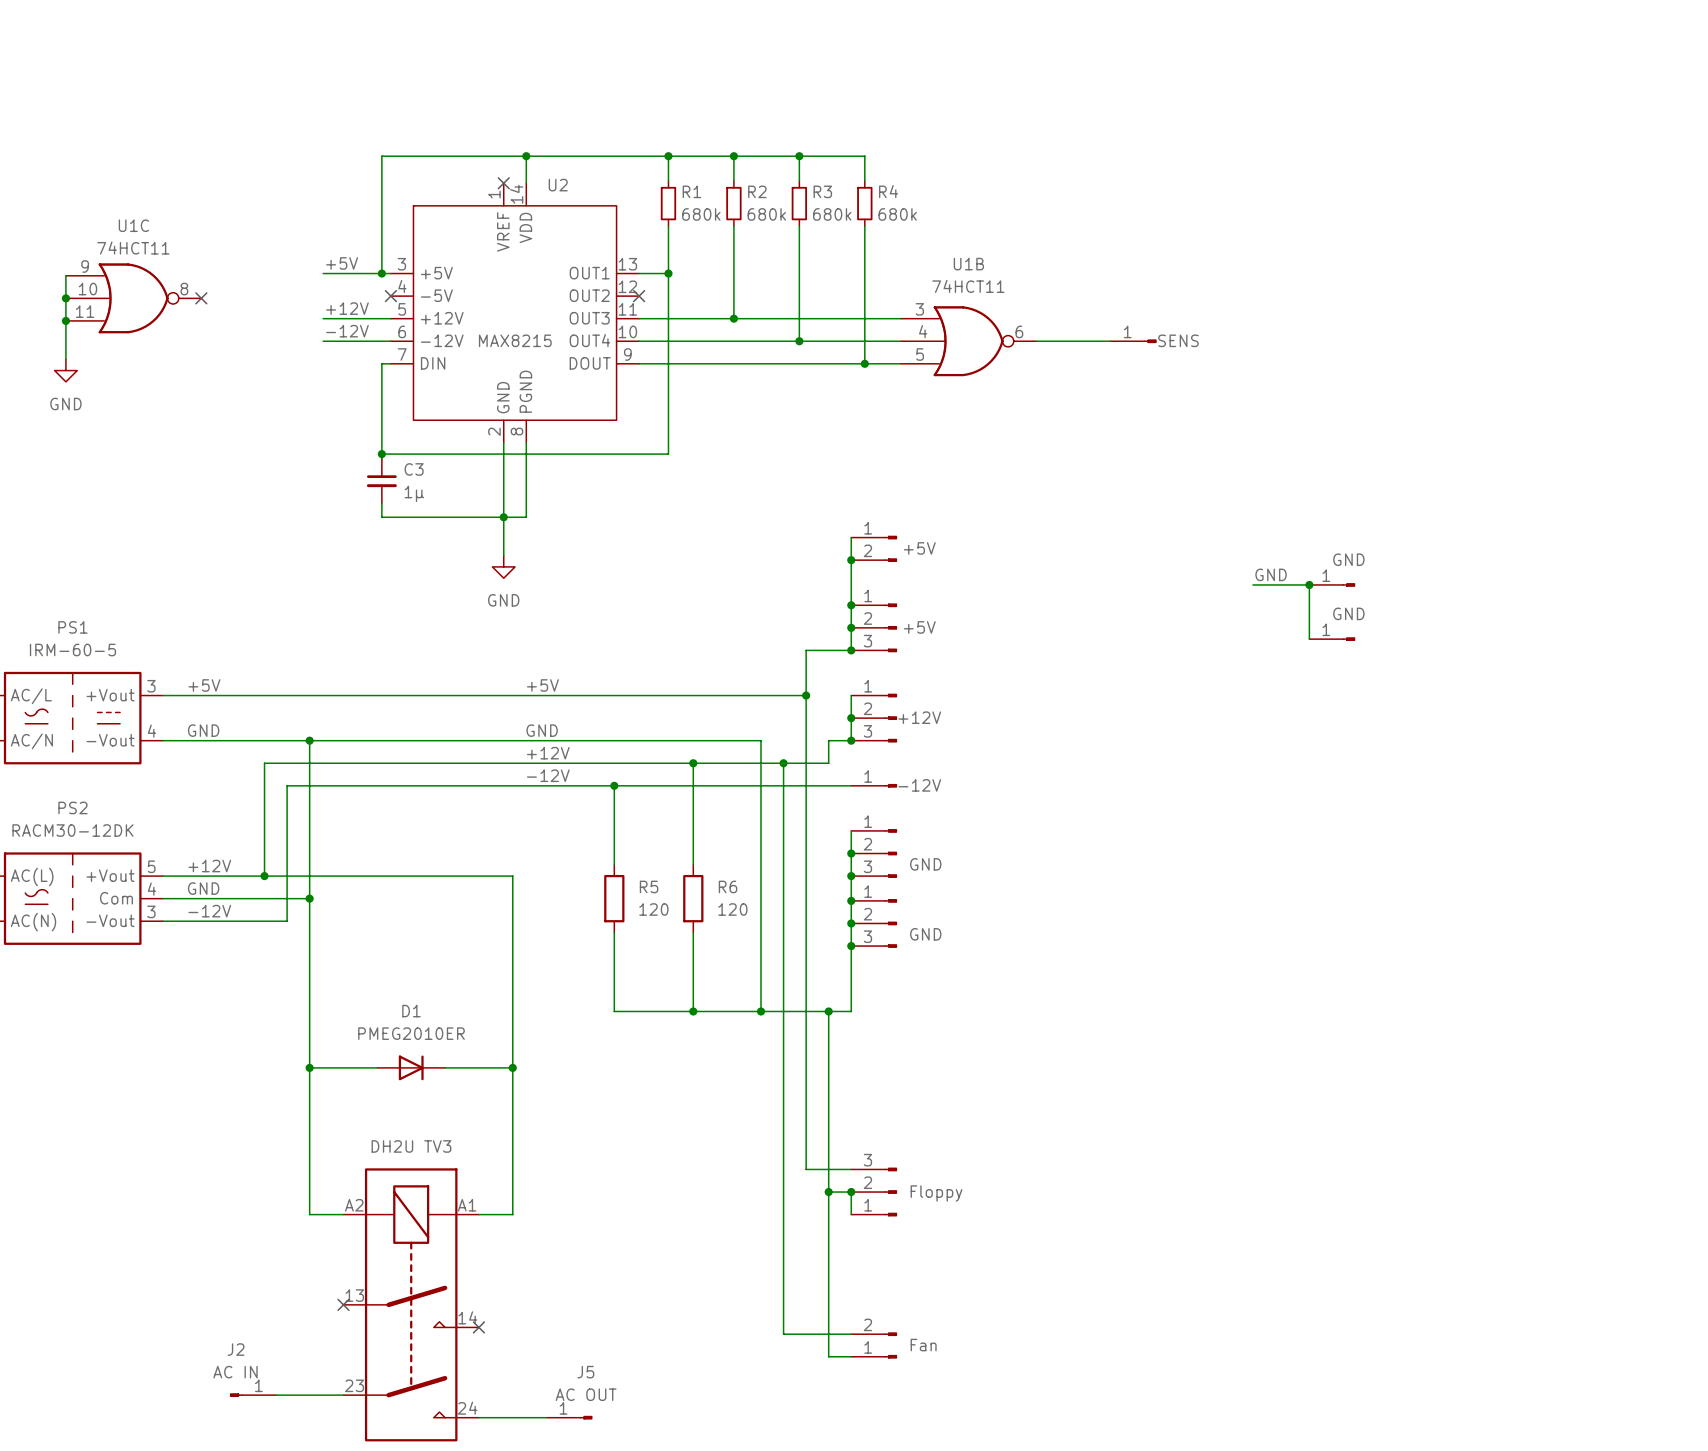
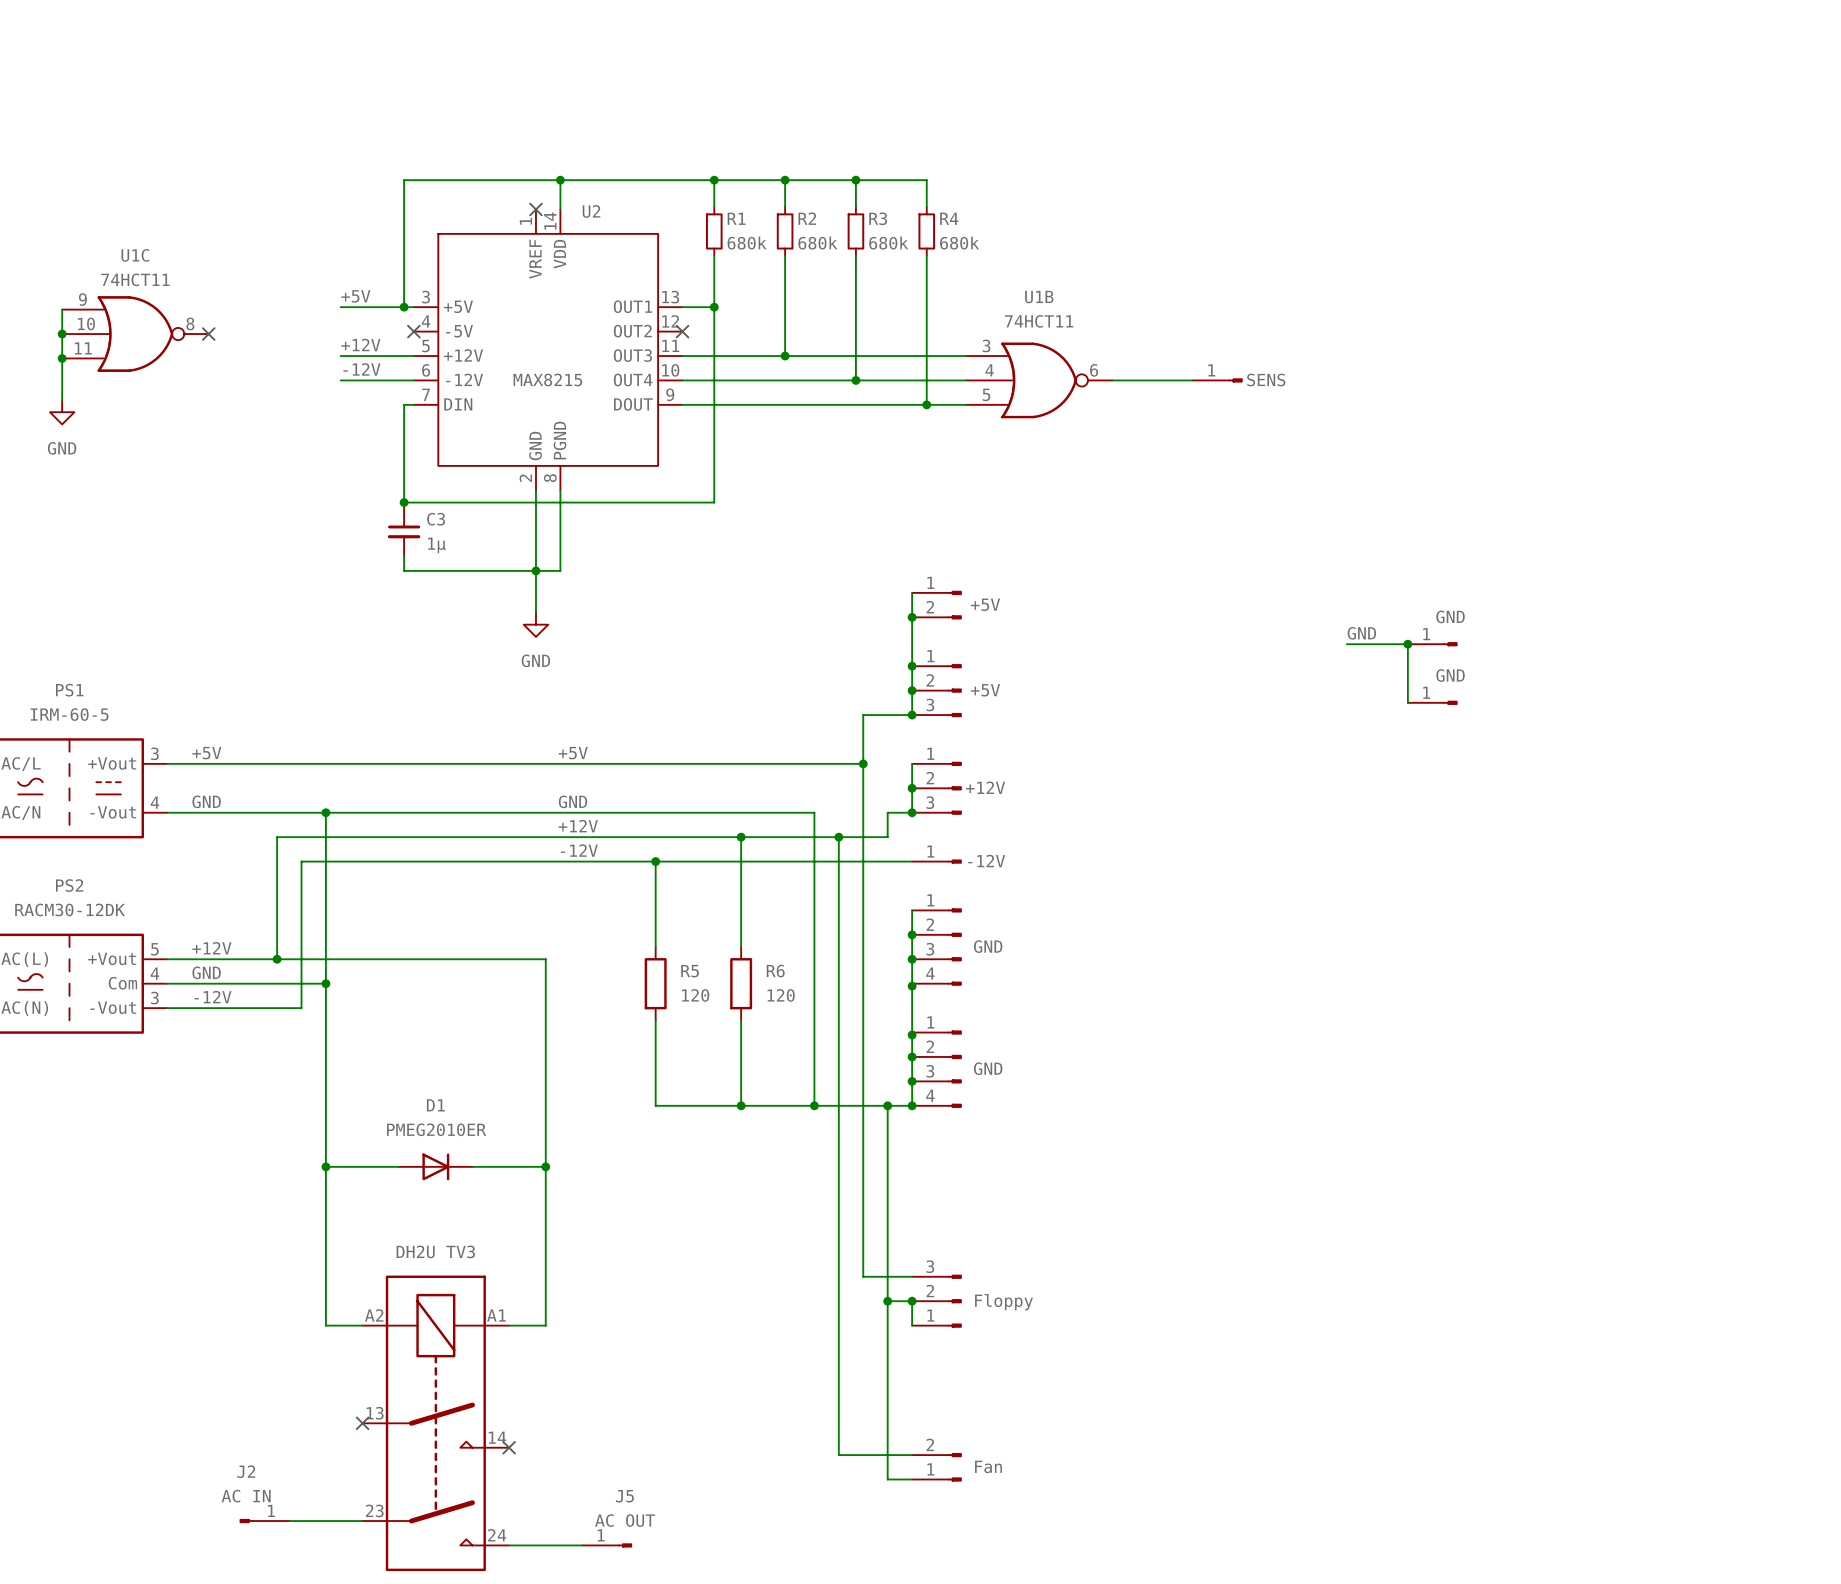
part: none -> GND (936, 947)
junction: (851, 923) -> none
part: GND (874, 923) -> none
junction: none -> (912, 1056)
part: none -> GND (936, 1069)
junction: none -> (912, 1081)
junction: none -> (912, 1105)

